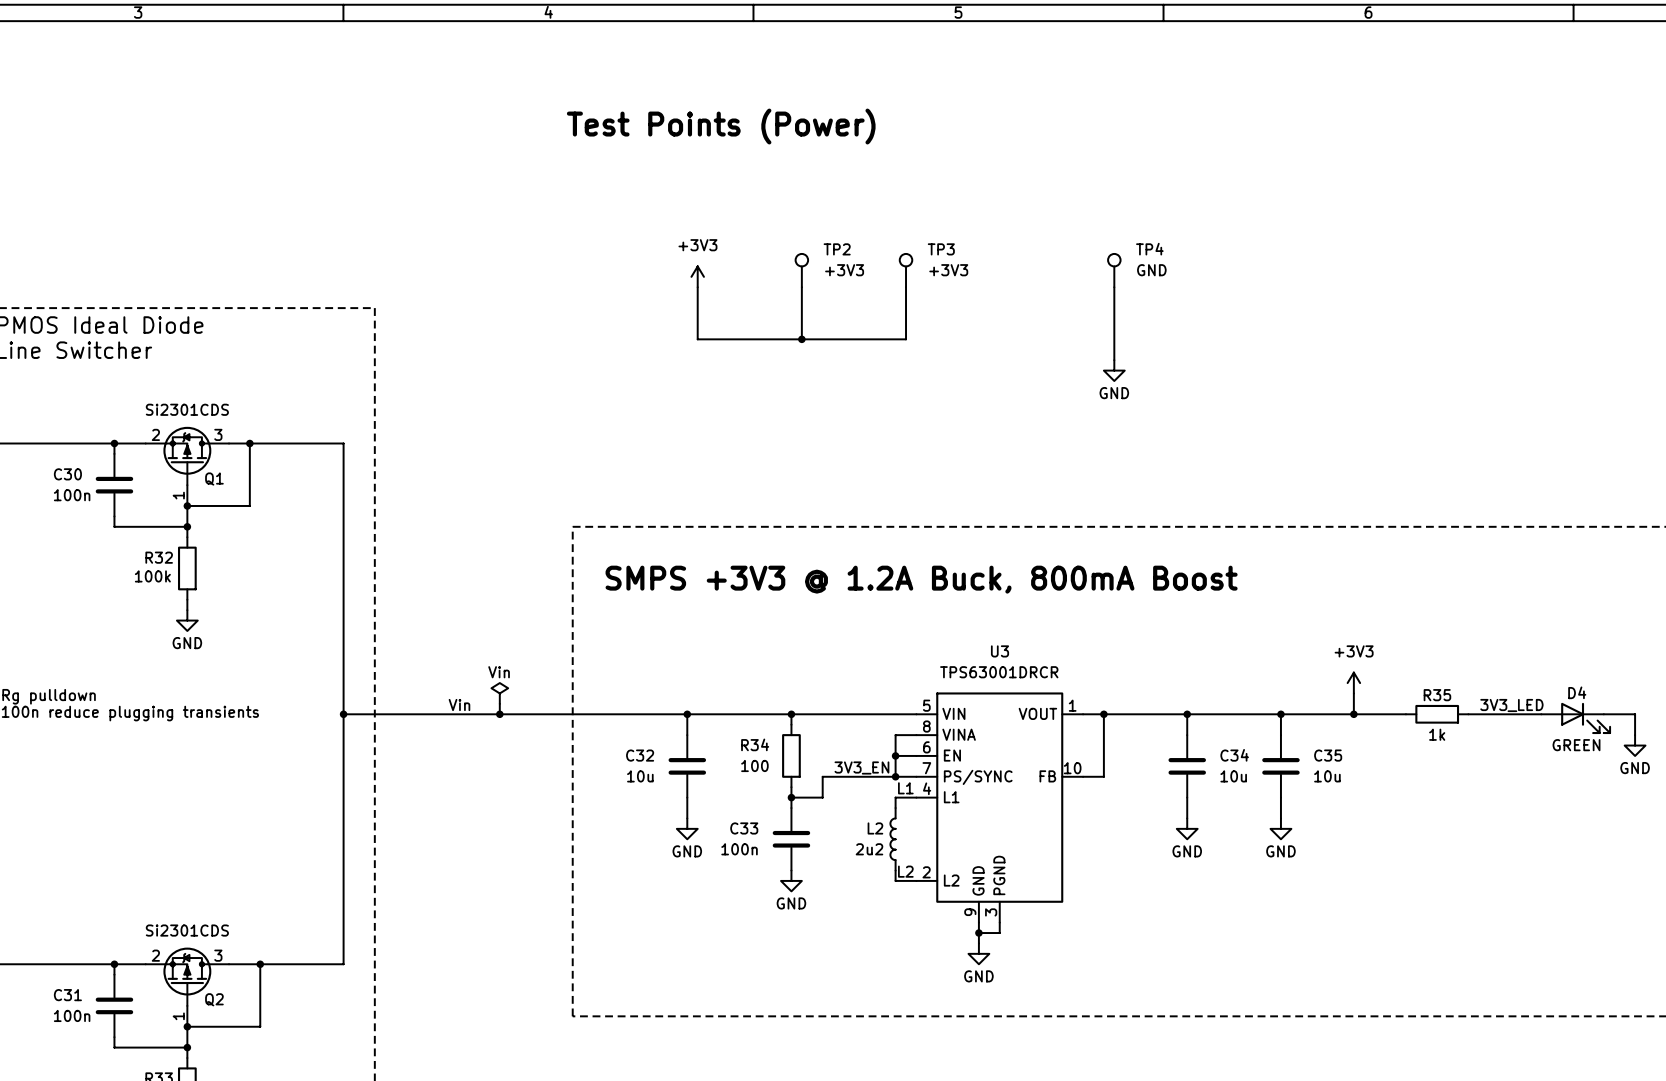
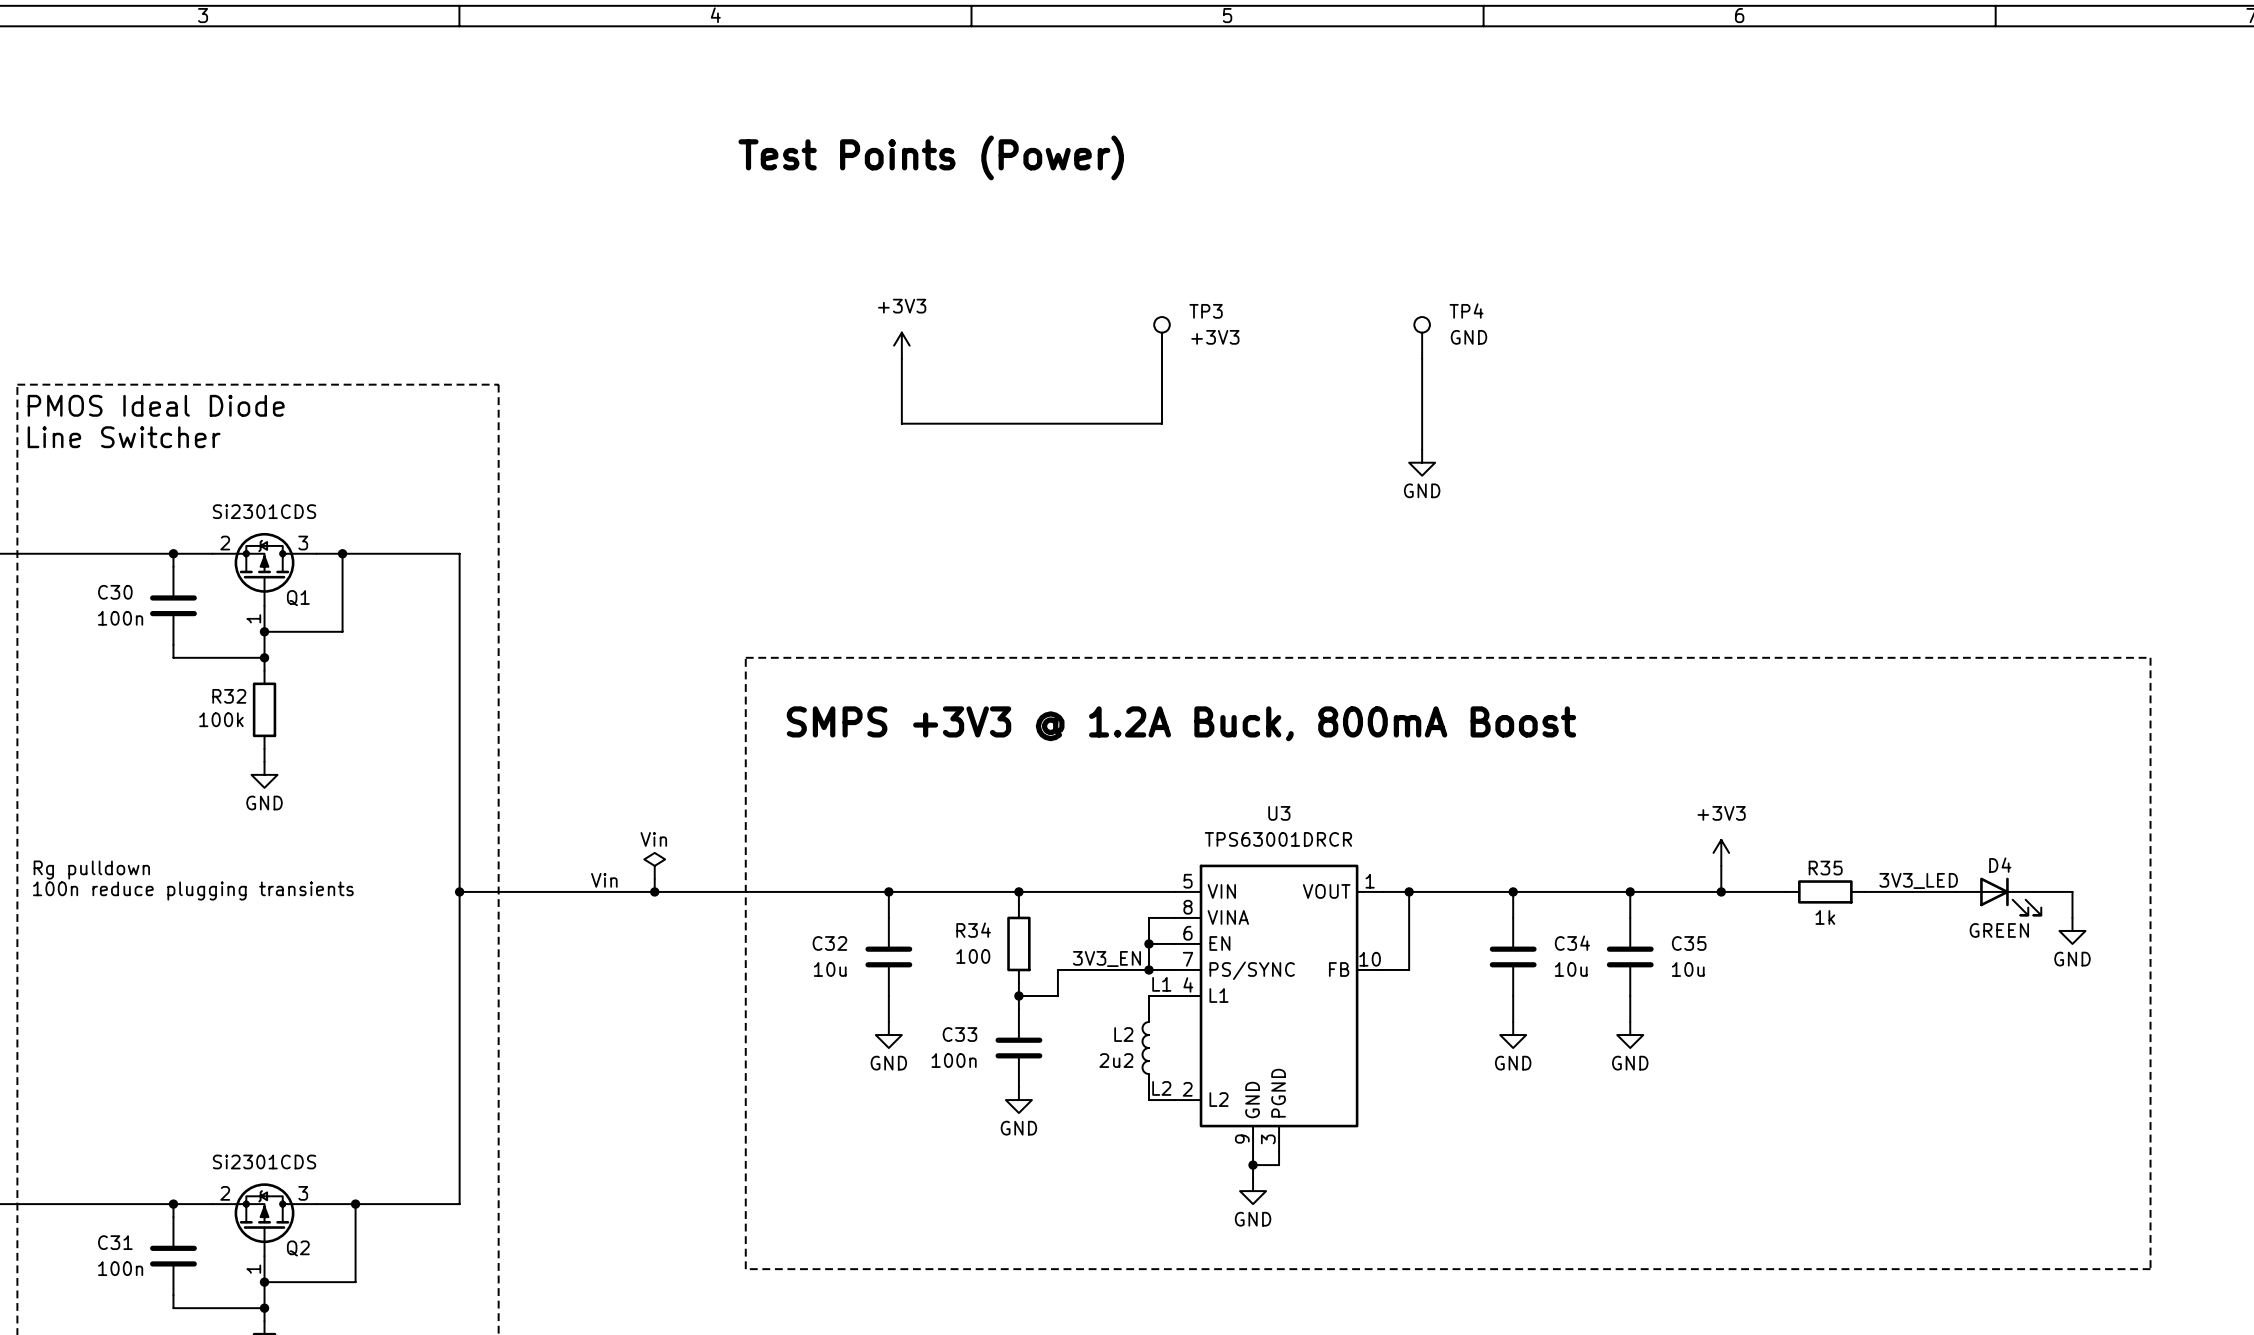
TP2: +3V3 (801, 270) -> none
wire: (801, 287) (801, 339) -> none
junction: (801, 339) -> none

